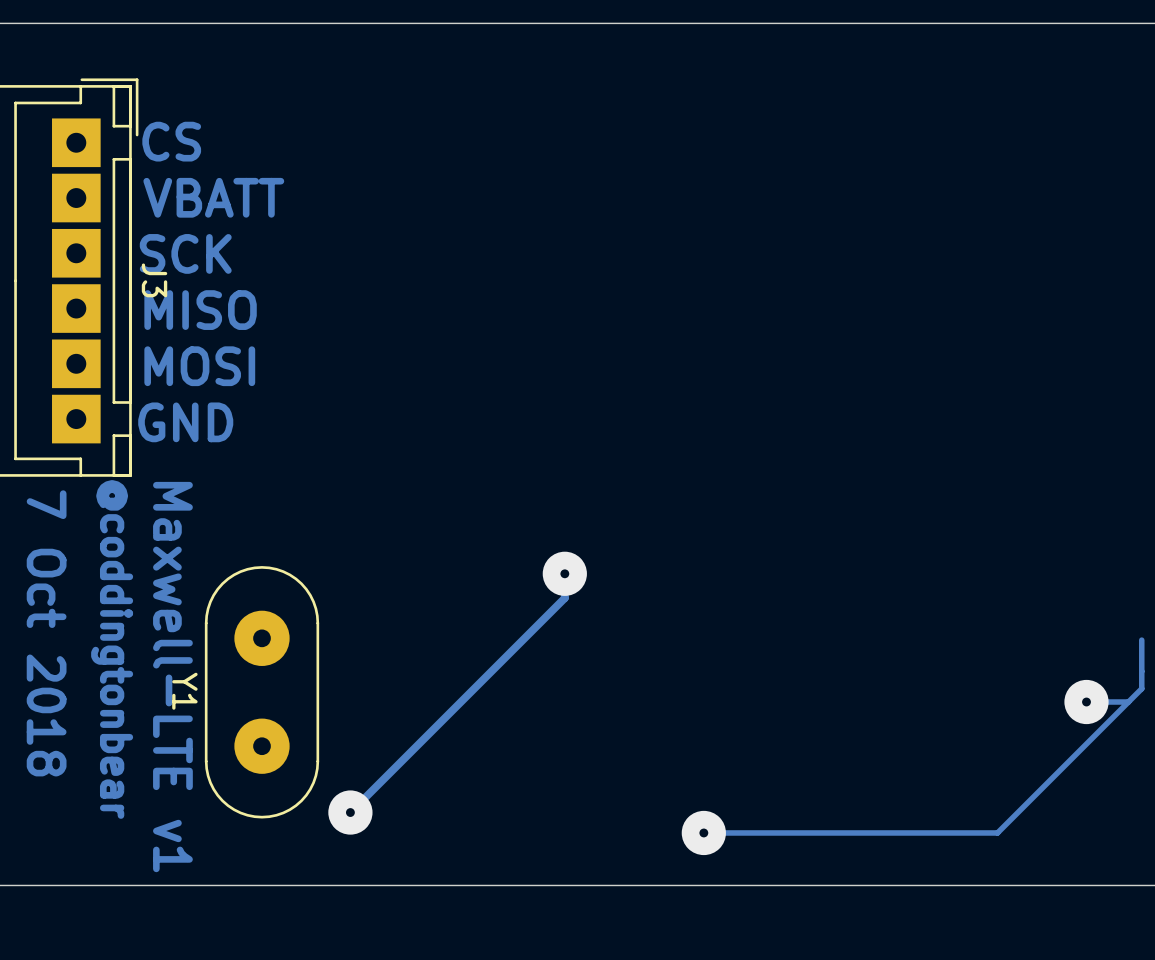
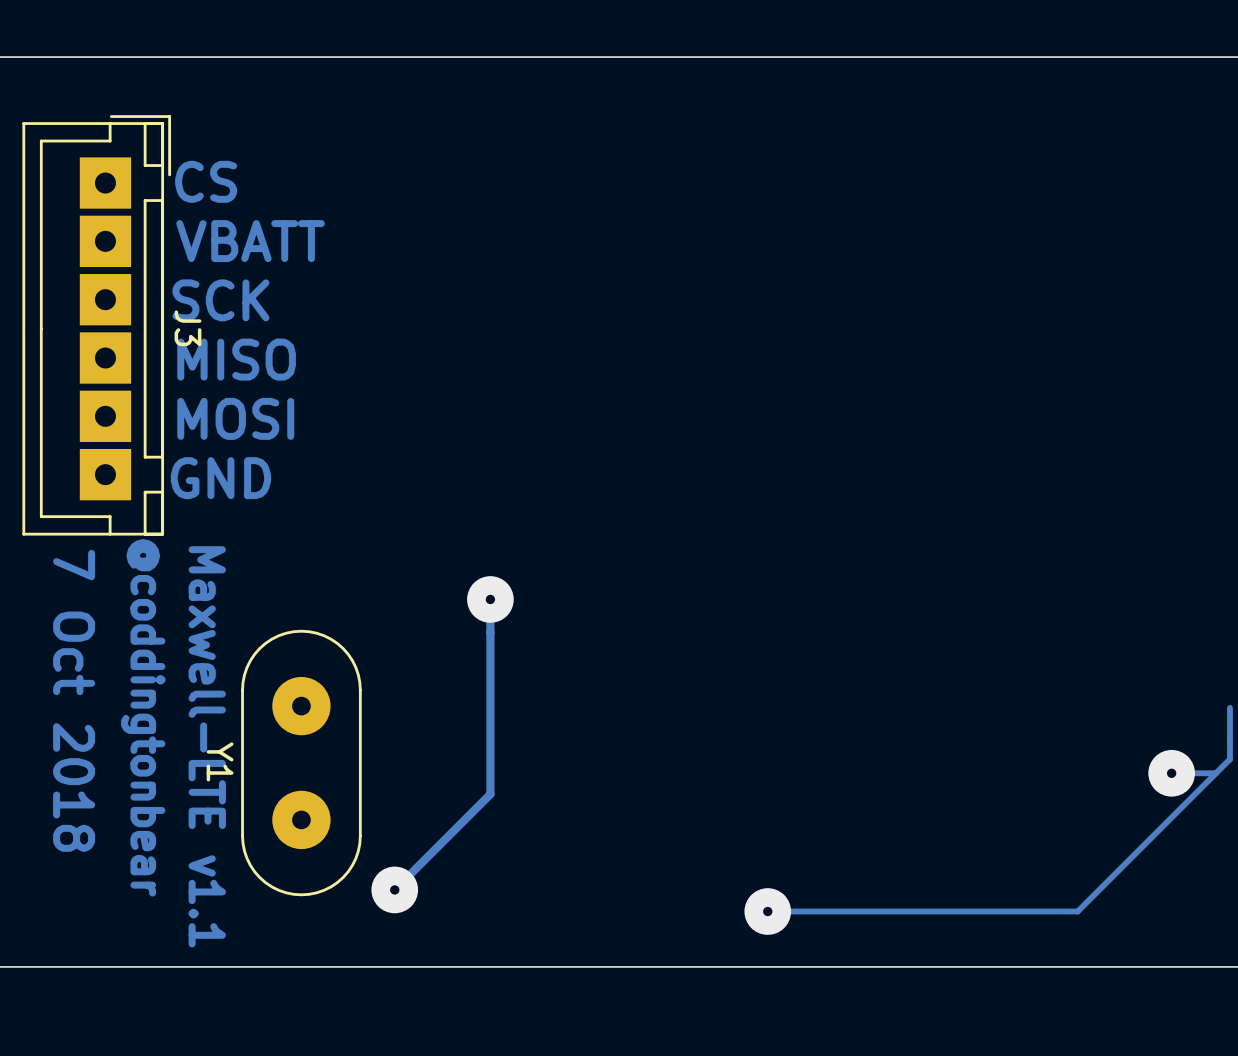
track: (564, 573) (564, 598) (441, 721) -> (490, 599) (490, 794)
via position: (564, 573) -> (490, 599)
text: Maxwell-LTE v1 (172, 677) -> Maxwell-LTE v1.1 (207, 746)

